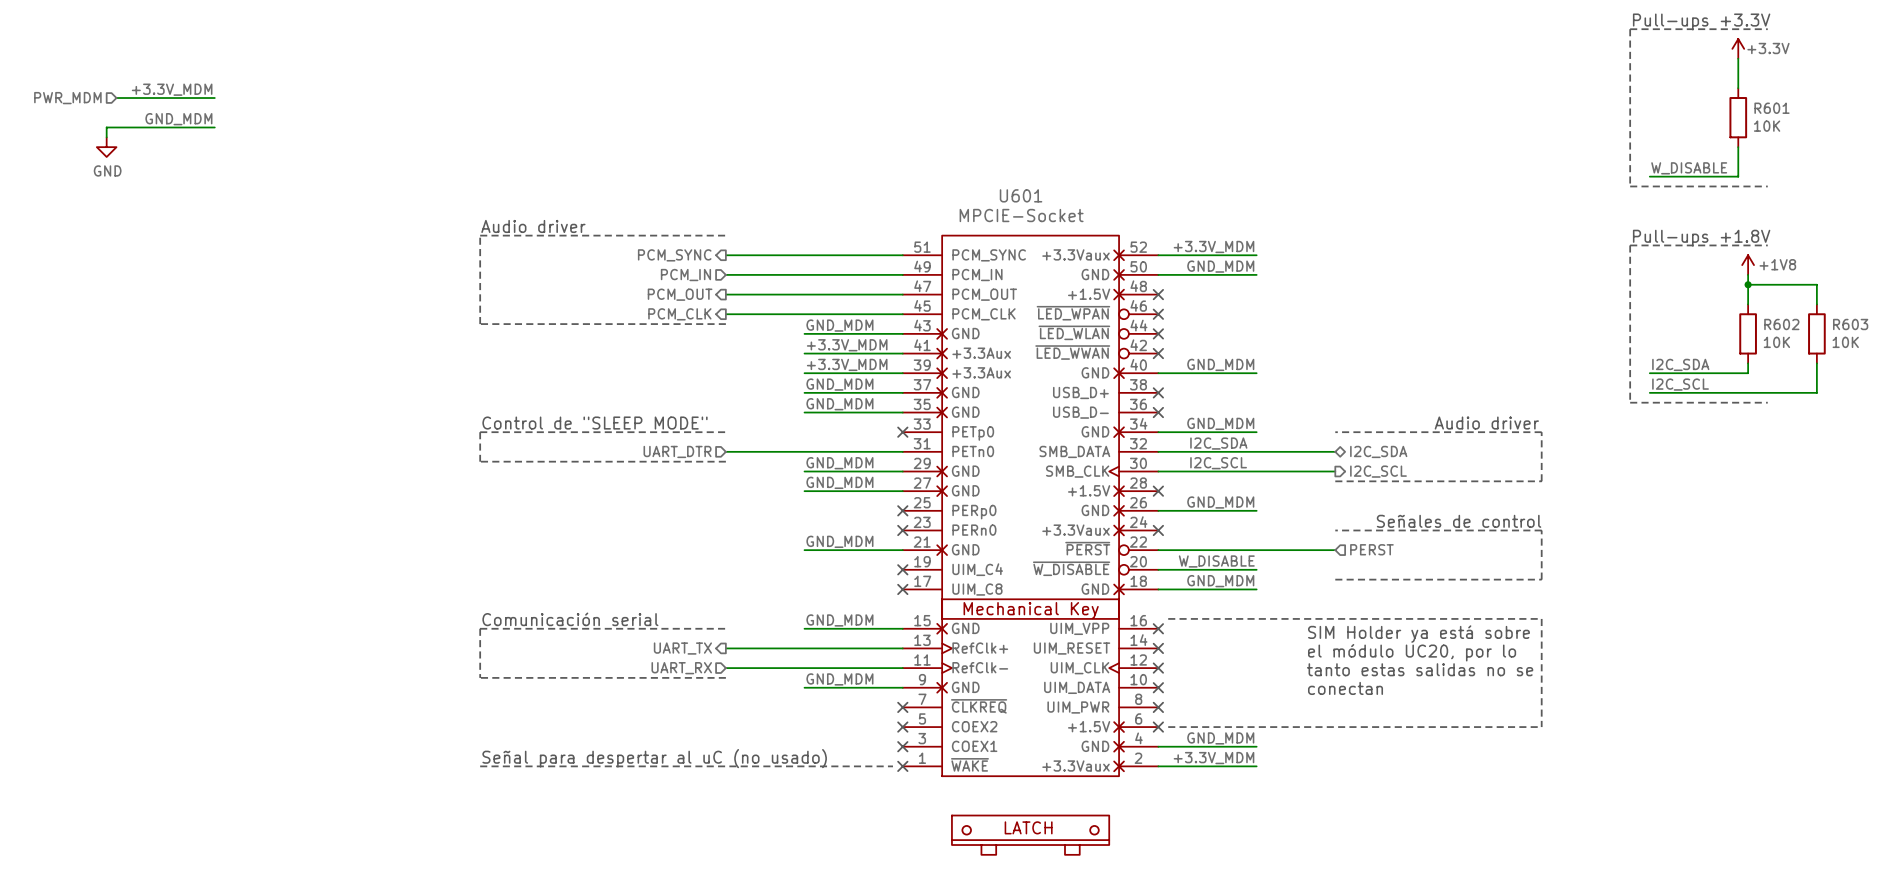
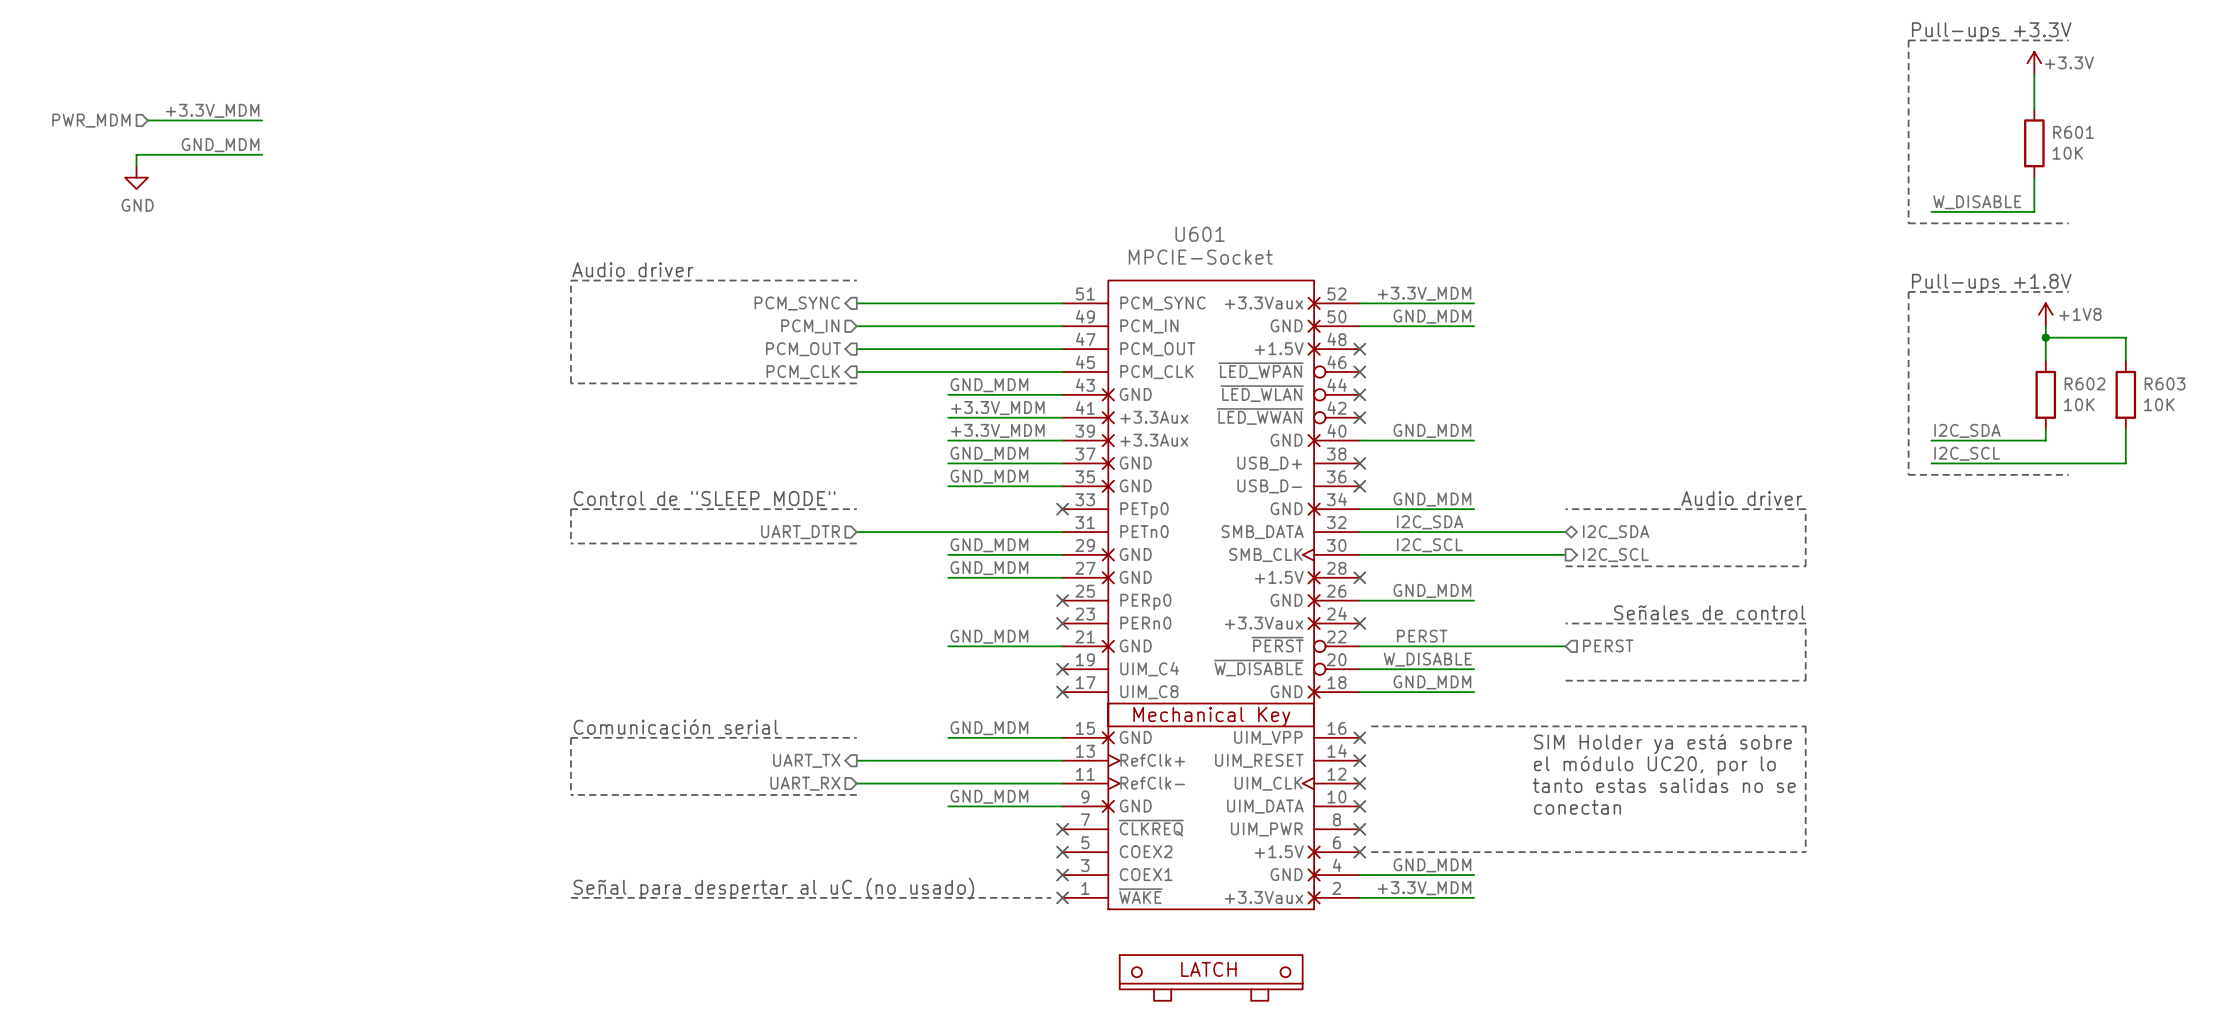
label: none -> PERST (1422, 636)

